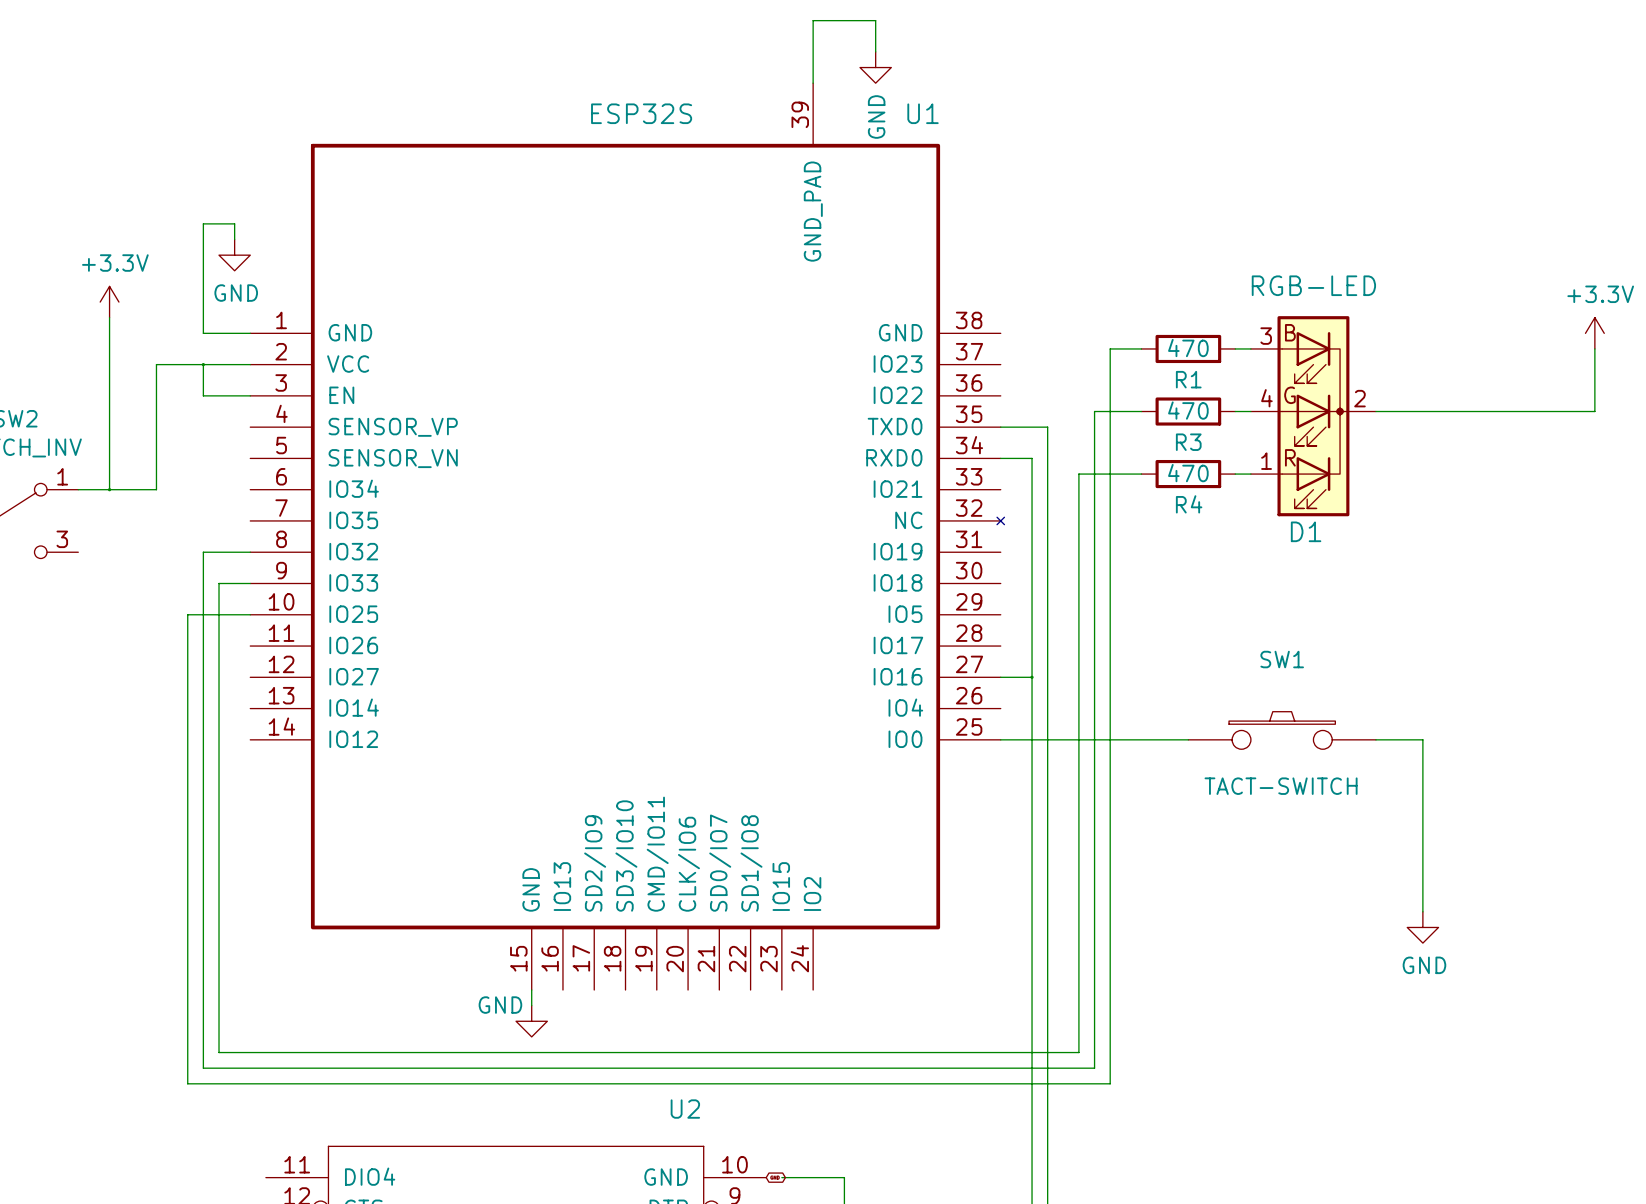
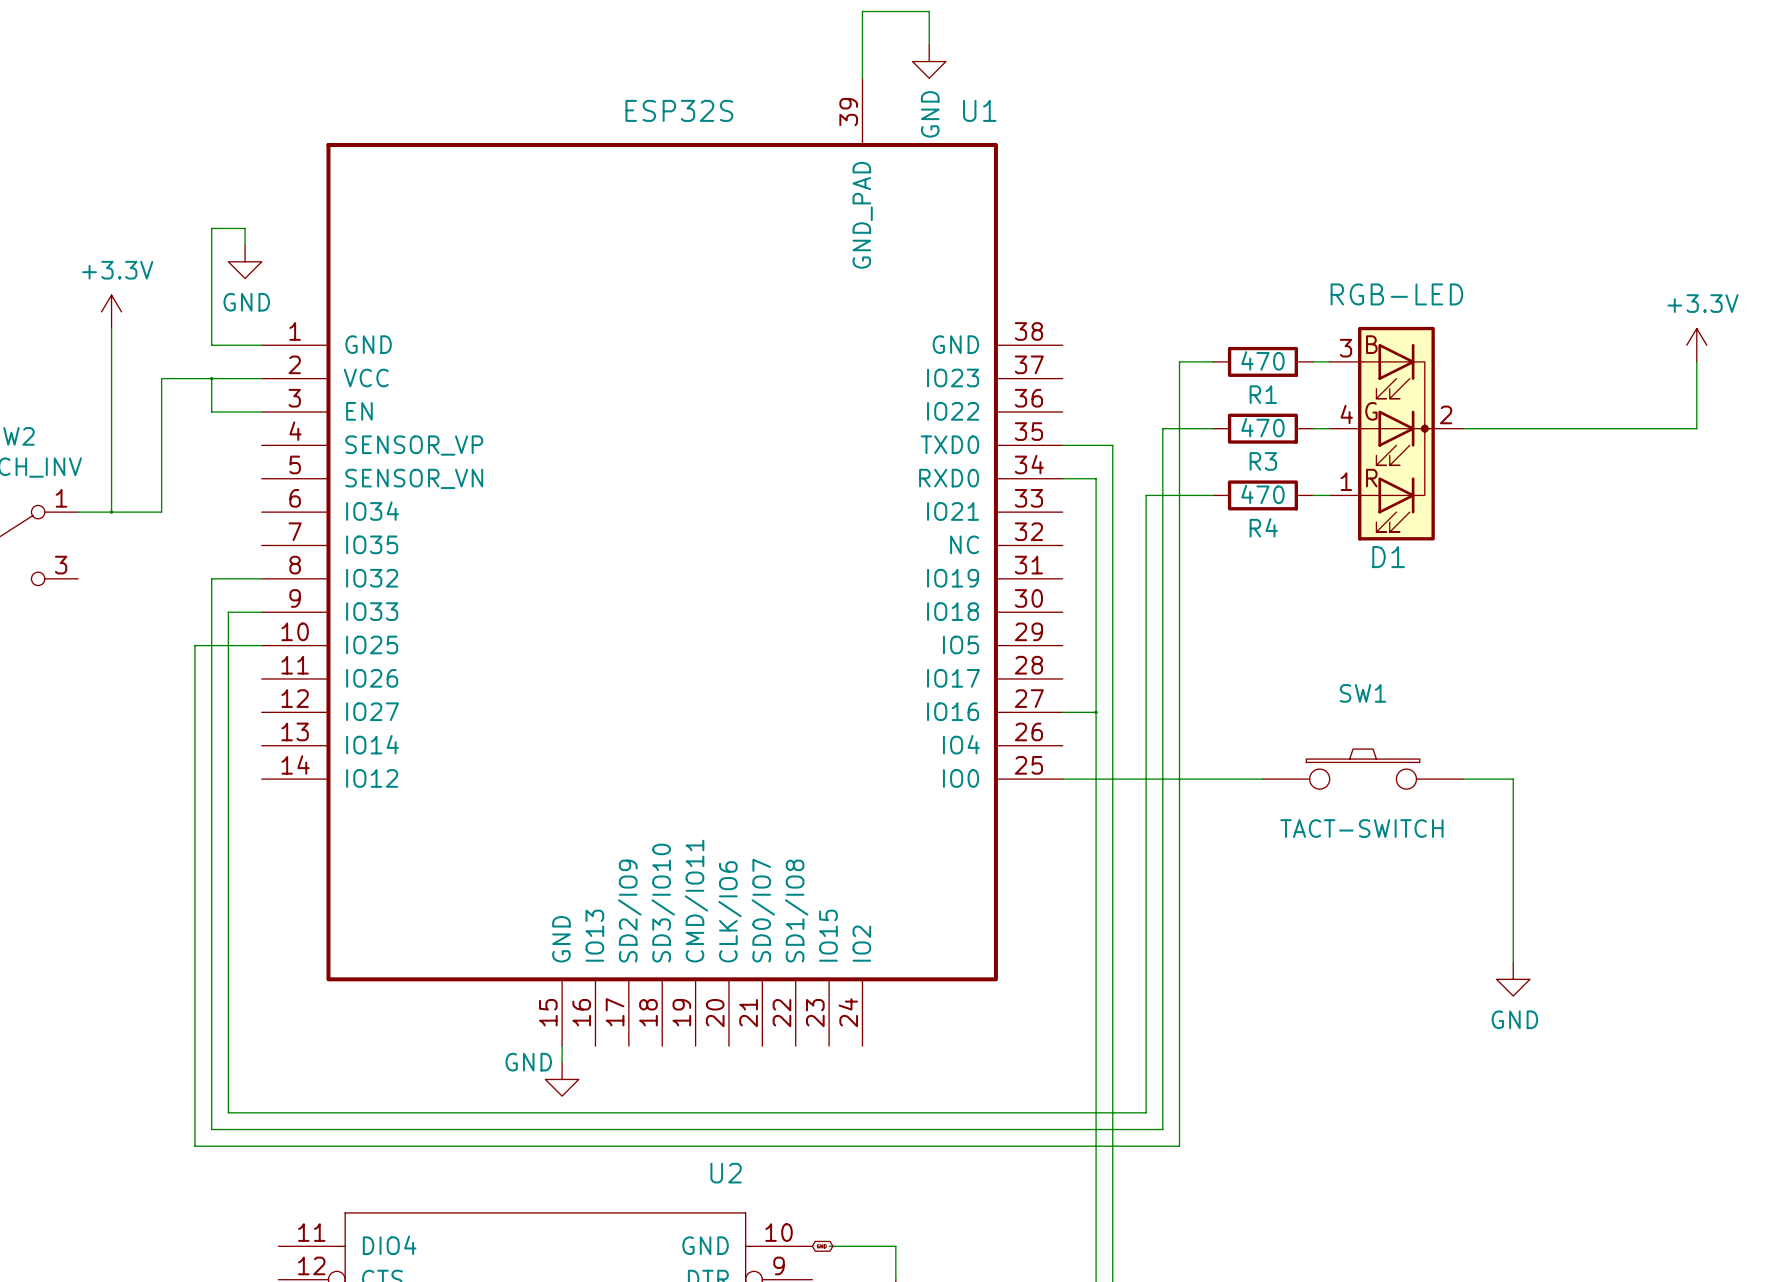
U1 symbol: [250, 83, 1005, 991] -> [261, 78, 1063, 1047]

